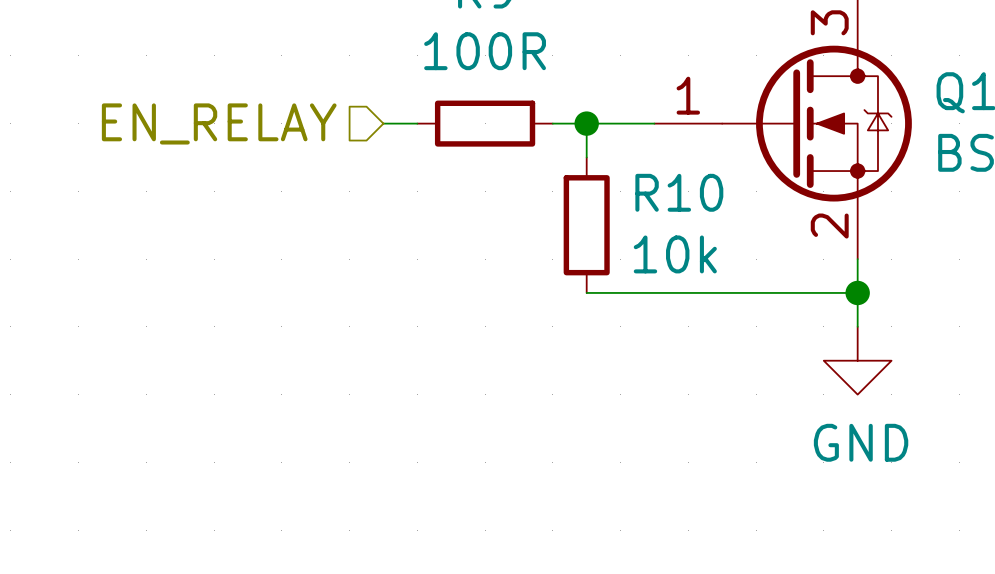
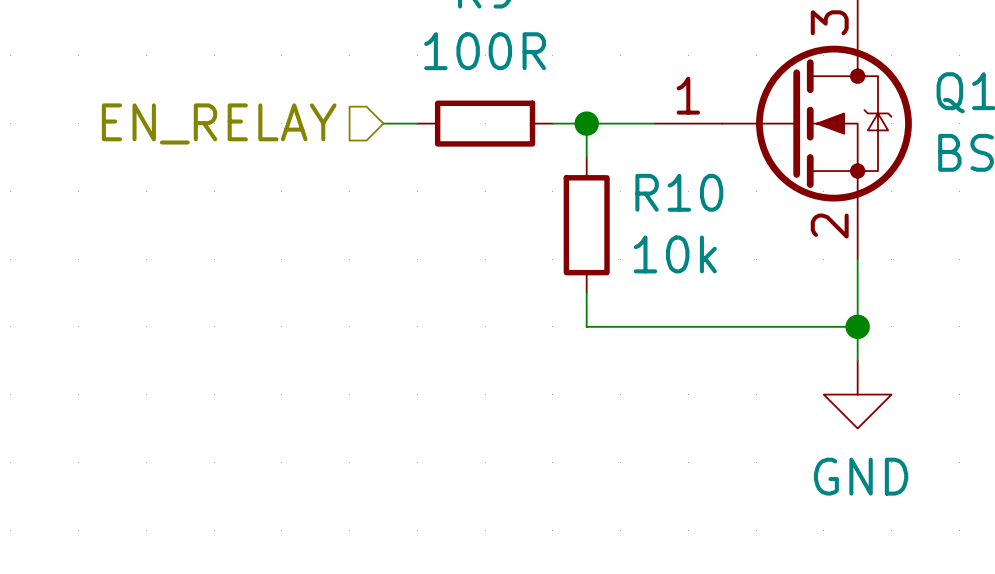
wire: (586, 292) (857, 292) -> (586, 292) (586, 326) (857, 326) (857, 360)
junction position: (857, 292) -> (857, 326)
power symbol position: GND (857, 360) -> GND (857, 394)

